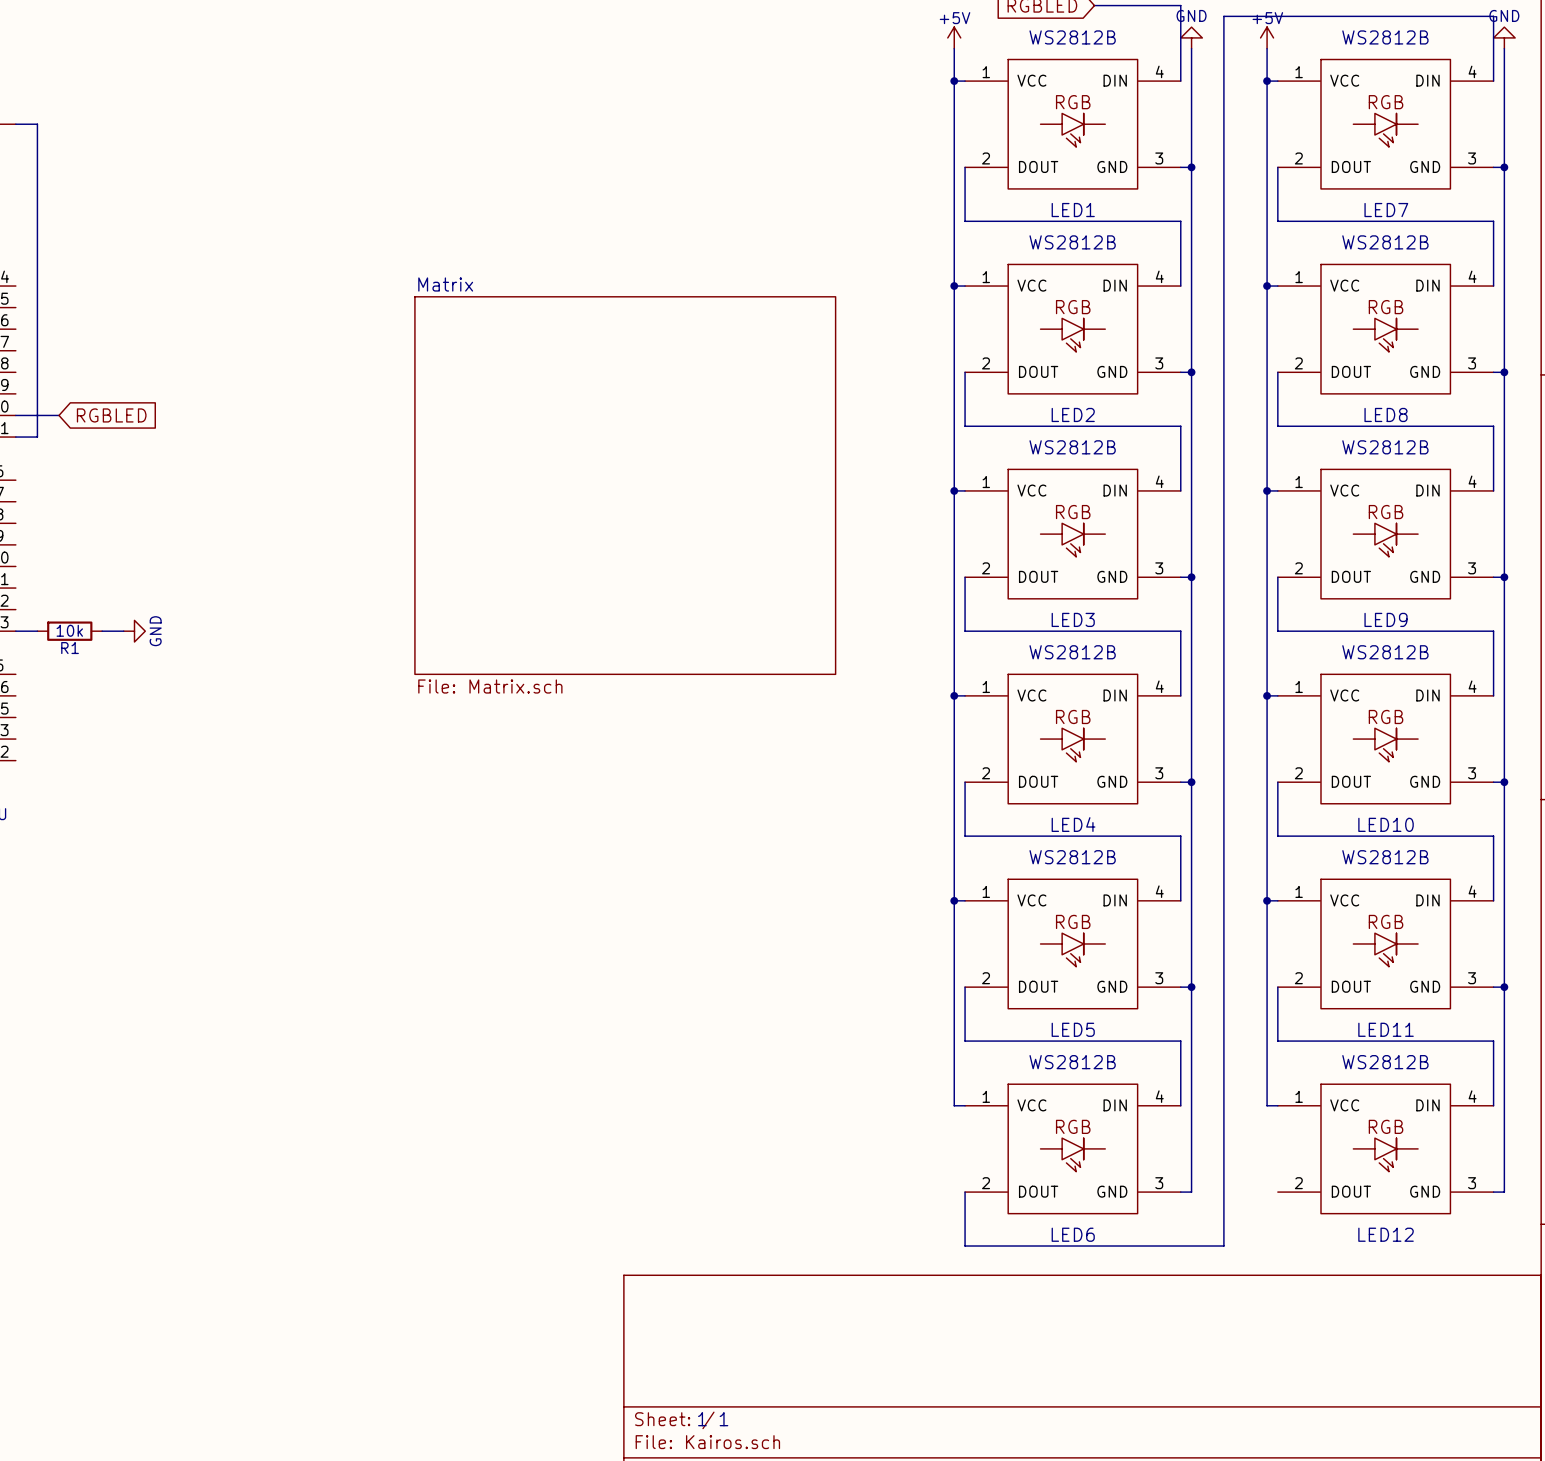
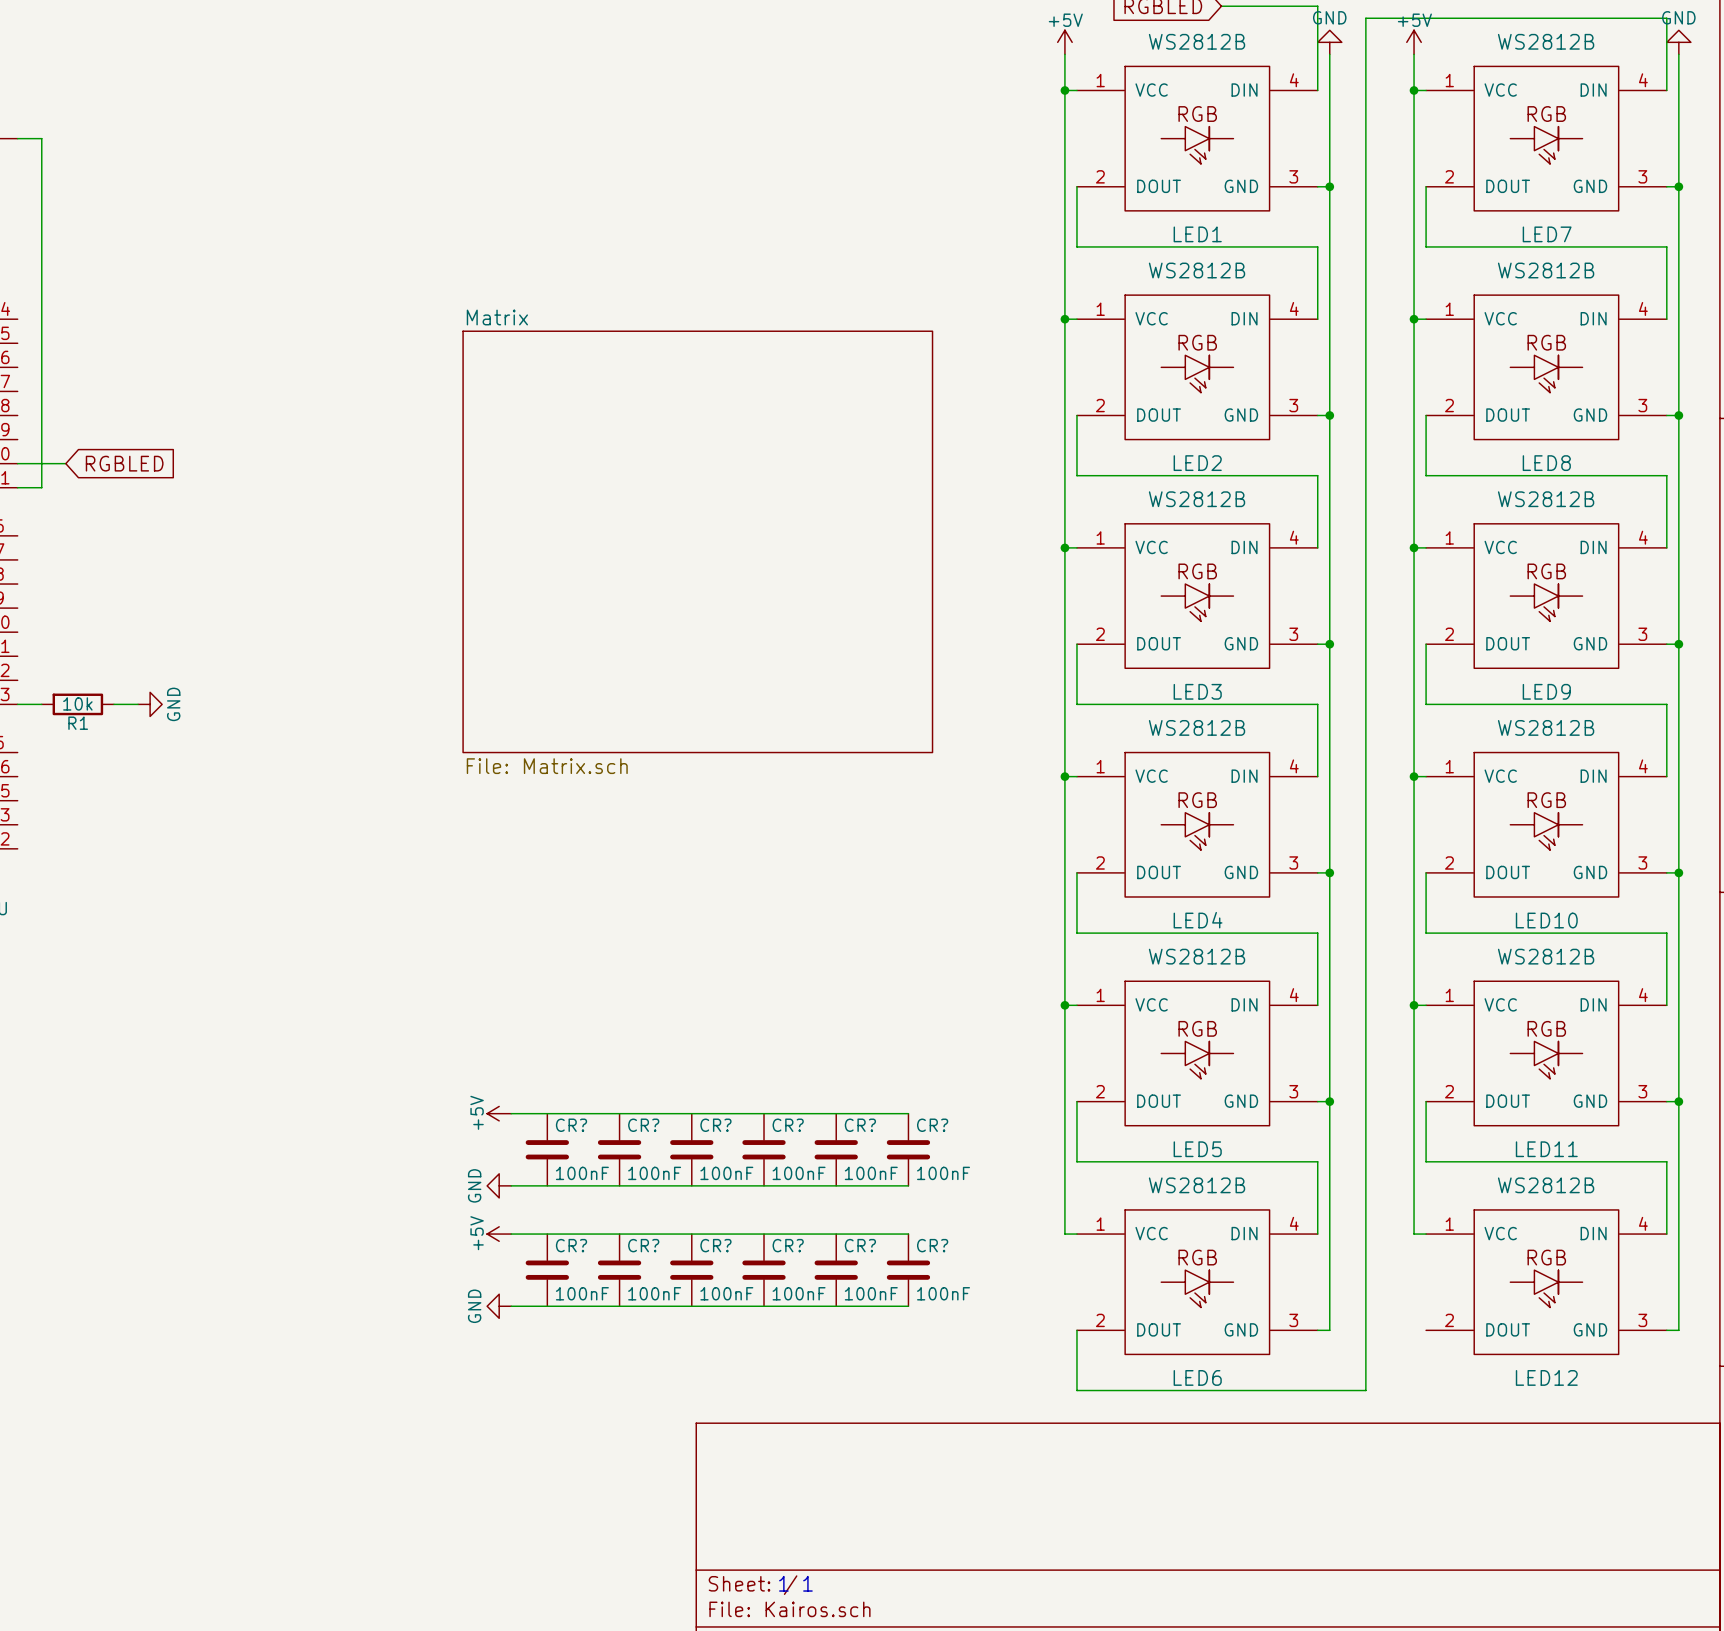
power symbol: none -> +5V (499, 1113)
wire: none -> (511, 1113) (908, 1113)
CR?: none -> 100nF (547, 1149)
CR?: none -> 100nF (619, 1149)
CR?: none -> 100nF (691, 1149)
CR?: none -> 100nF (764, 1149)
CR?: none -> 100nF (836, 1149)
CR?: none -> 100nF (908, 1149)
power symbol: none -> GND (499, 1185)
wire: none -> (511, 1185) (908, 1185)
power symbol: none -> +5V (499, 1234)
wire: none -> (511, 1234) (908, 1234)
CR?: none -> 100nF (547, 1270)
CR?: none -> 100nF (619, 1270)
CR?: none -> 100nF (691, 1270)
CR?: none -> 100nF (764, 1270)
CR?: none -> 100nF (836, 1270)
CR?: none -> 100nF (908, 1270)
power symbol: none -> GND (499, 1306)
wire: none -> (511, 1306) (908, 1306)

